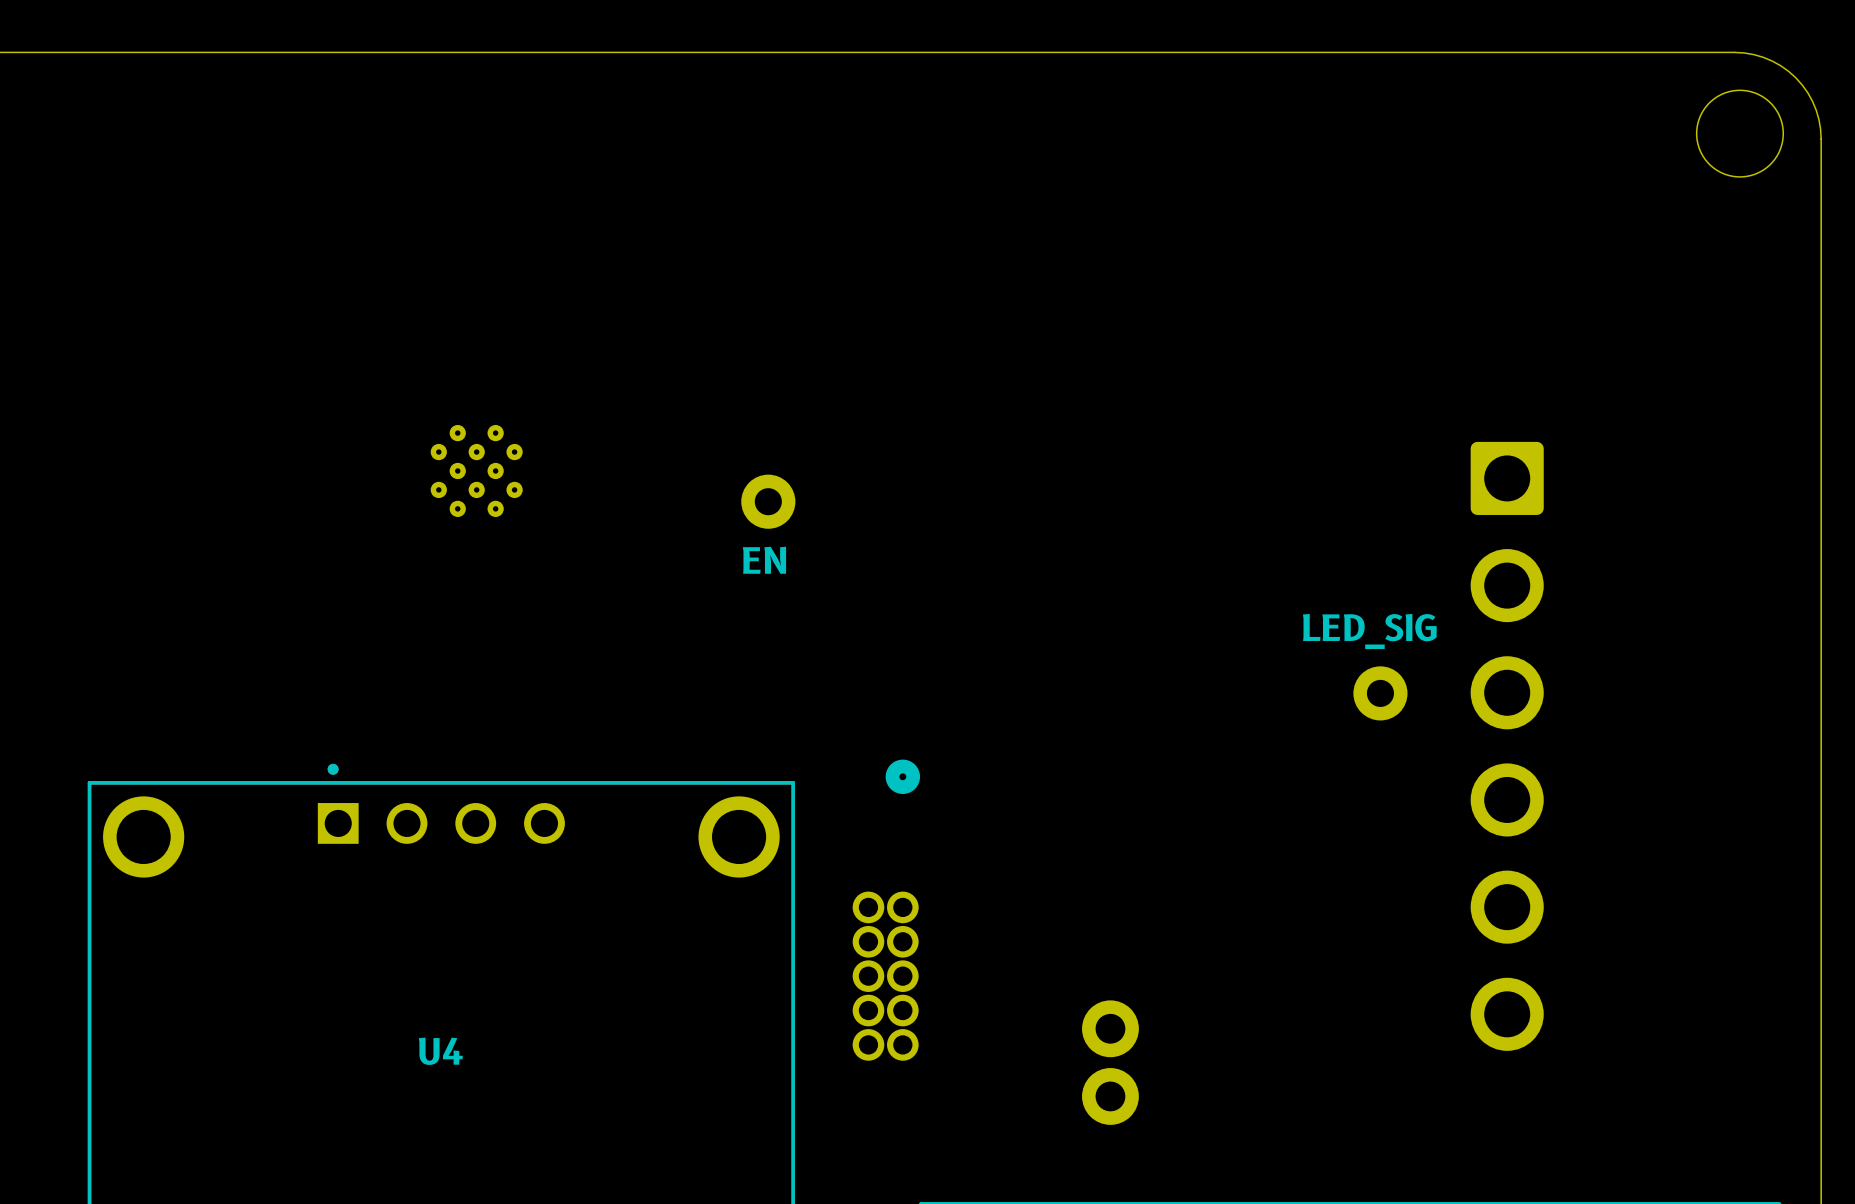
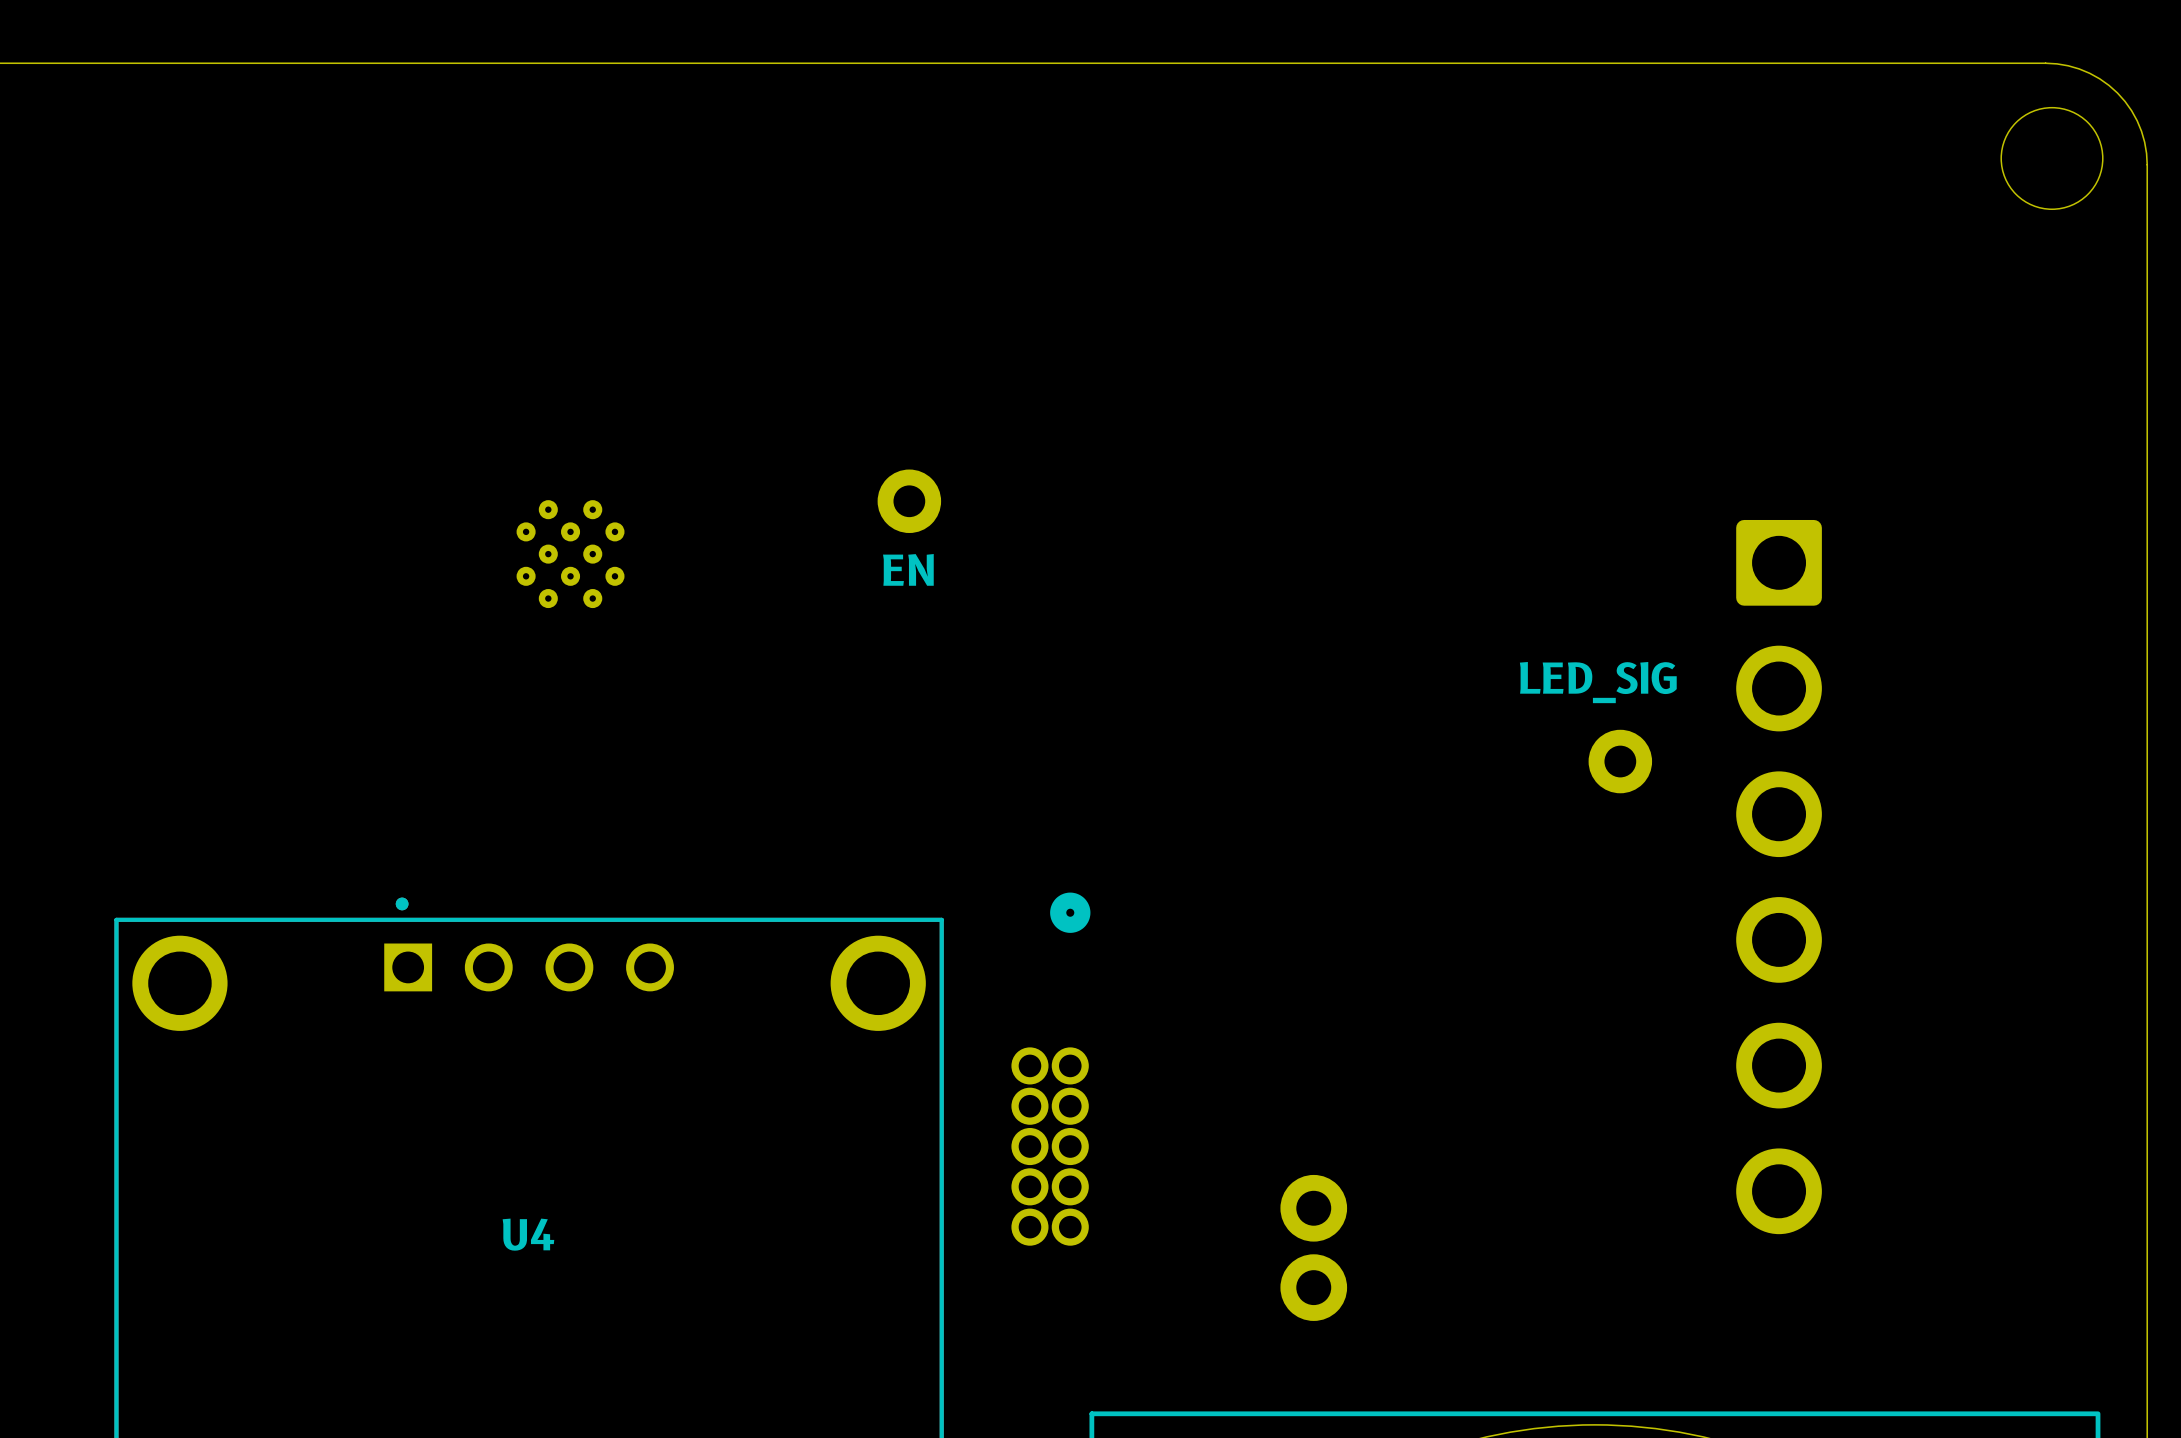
part position: (768, 501) -> (909, 501)
text position: EN (764, 560) -> EN (908, 569)
text position: LED_SIG (1369, 631) -> LED_SIG (1598, 682)
part position: (1380, 693) -> (1620, 761)

